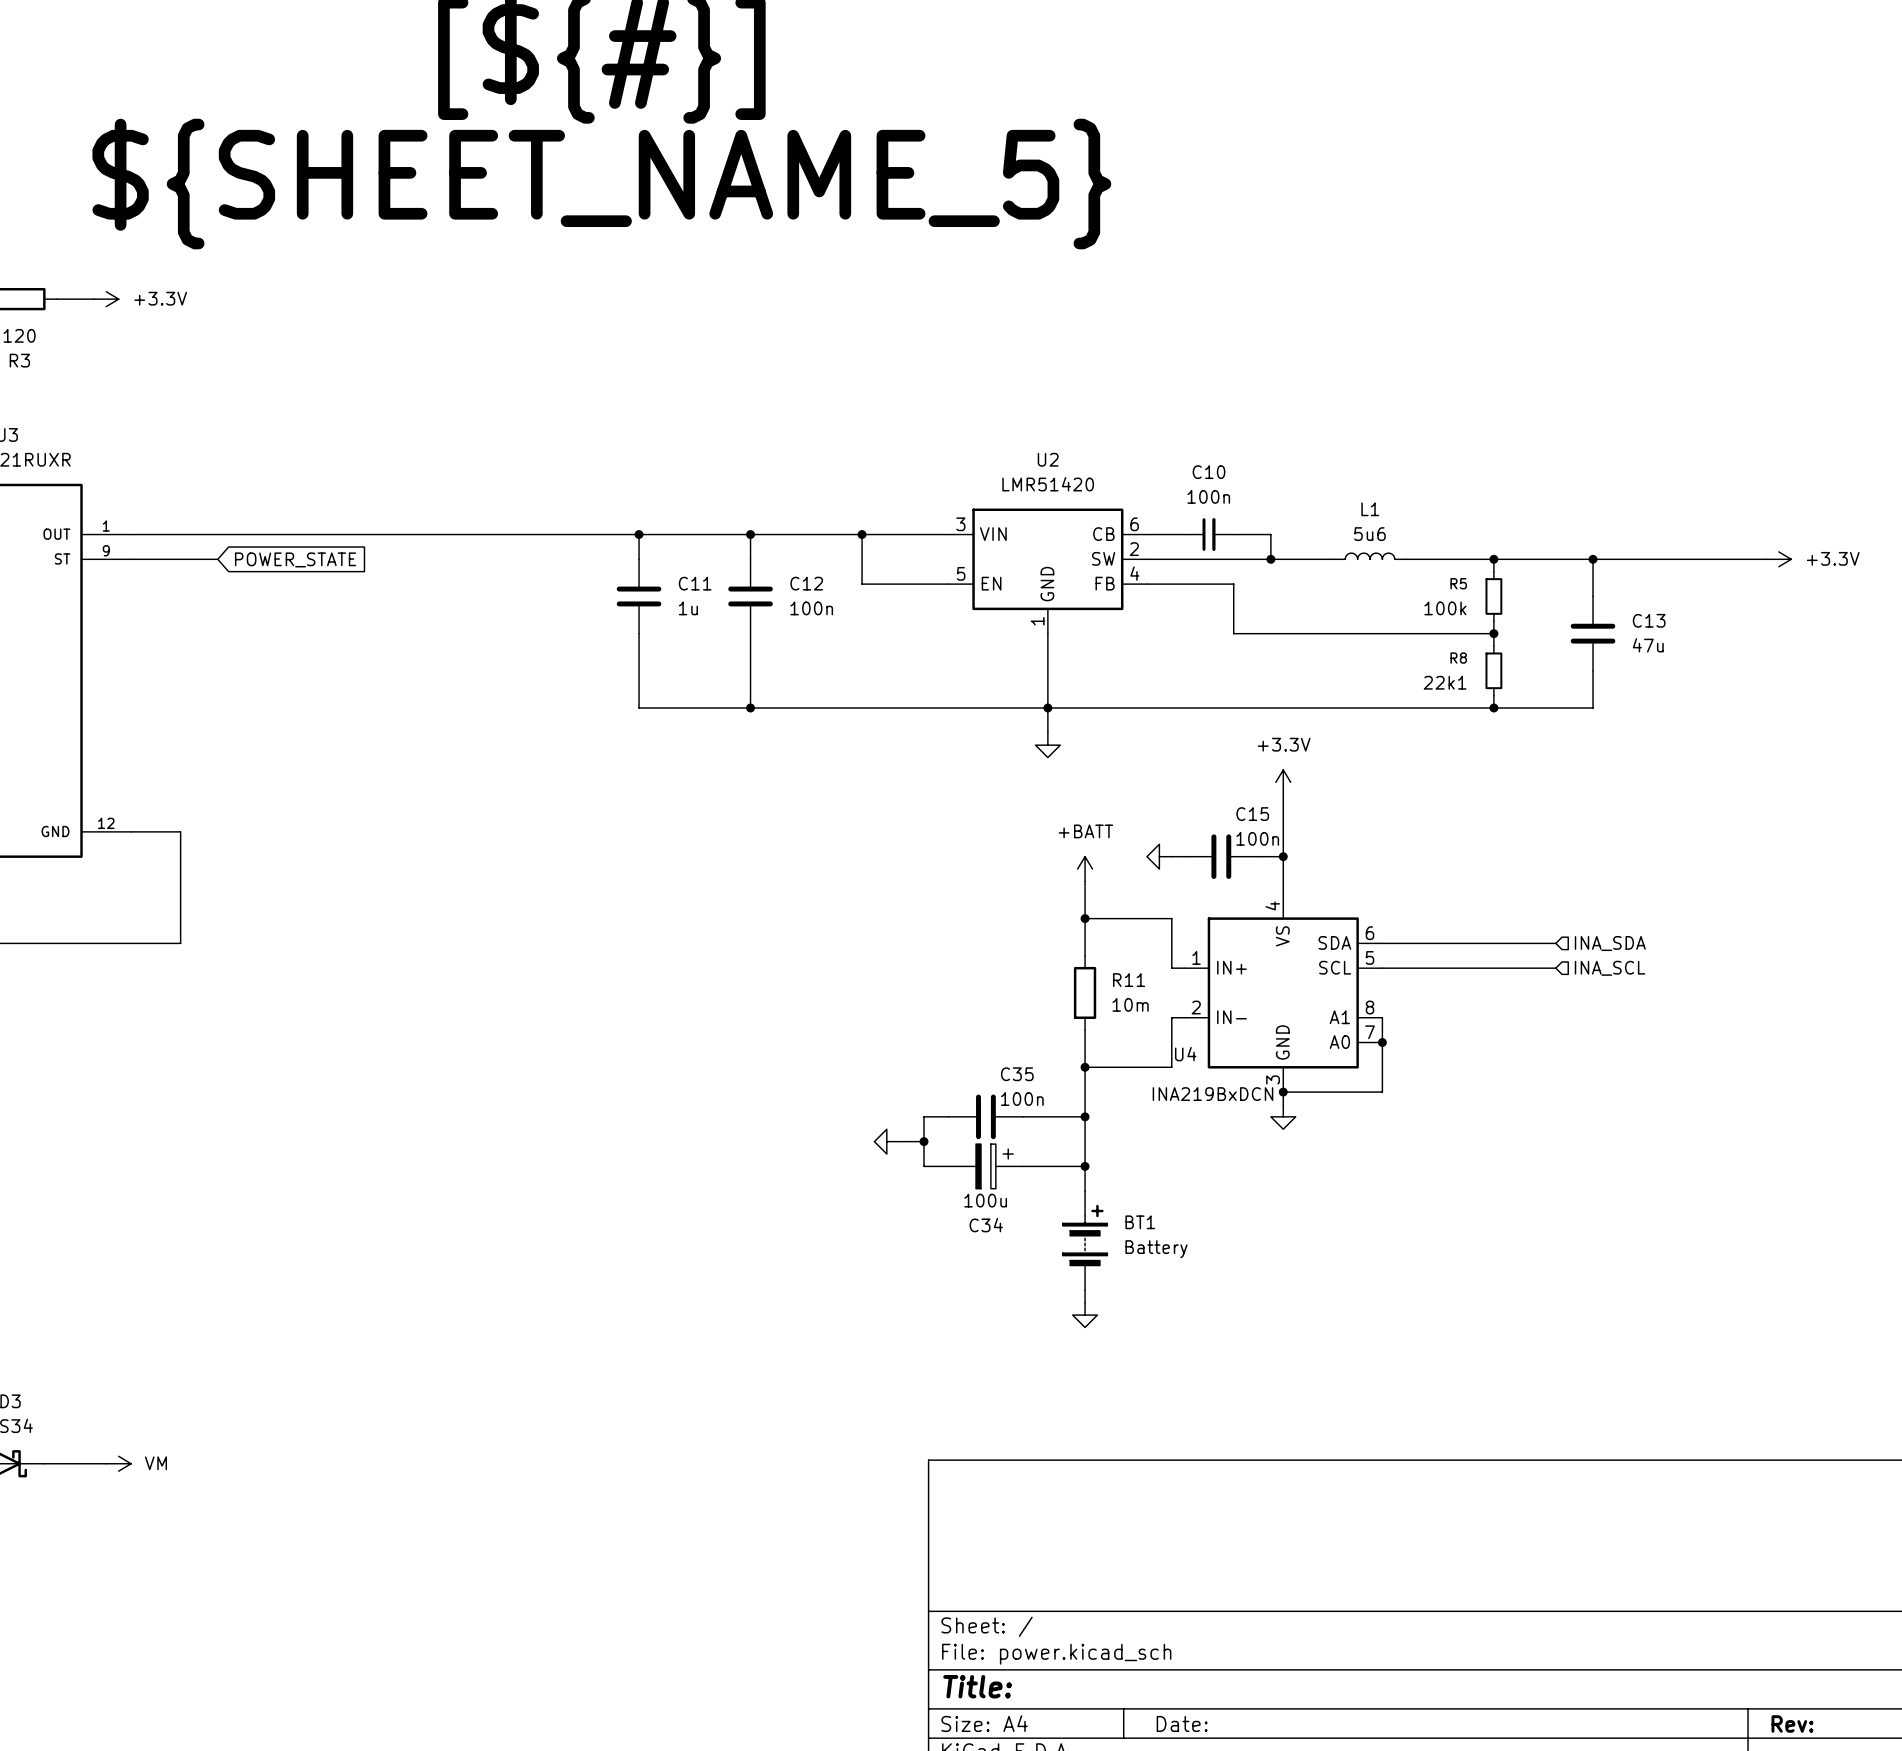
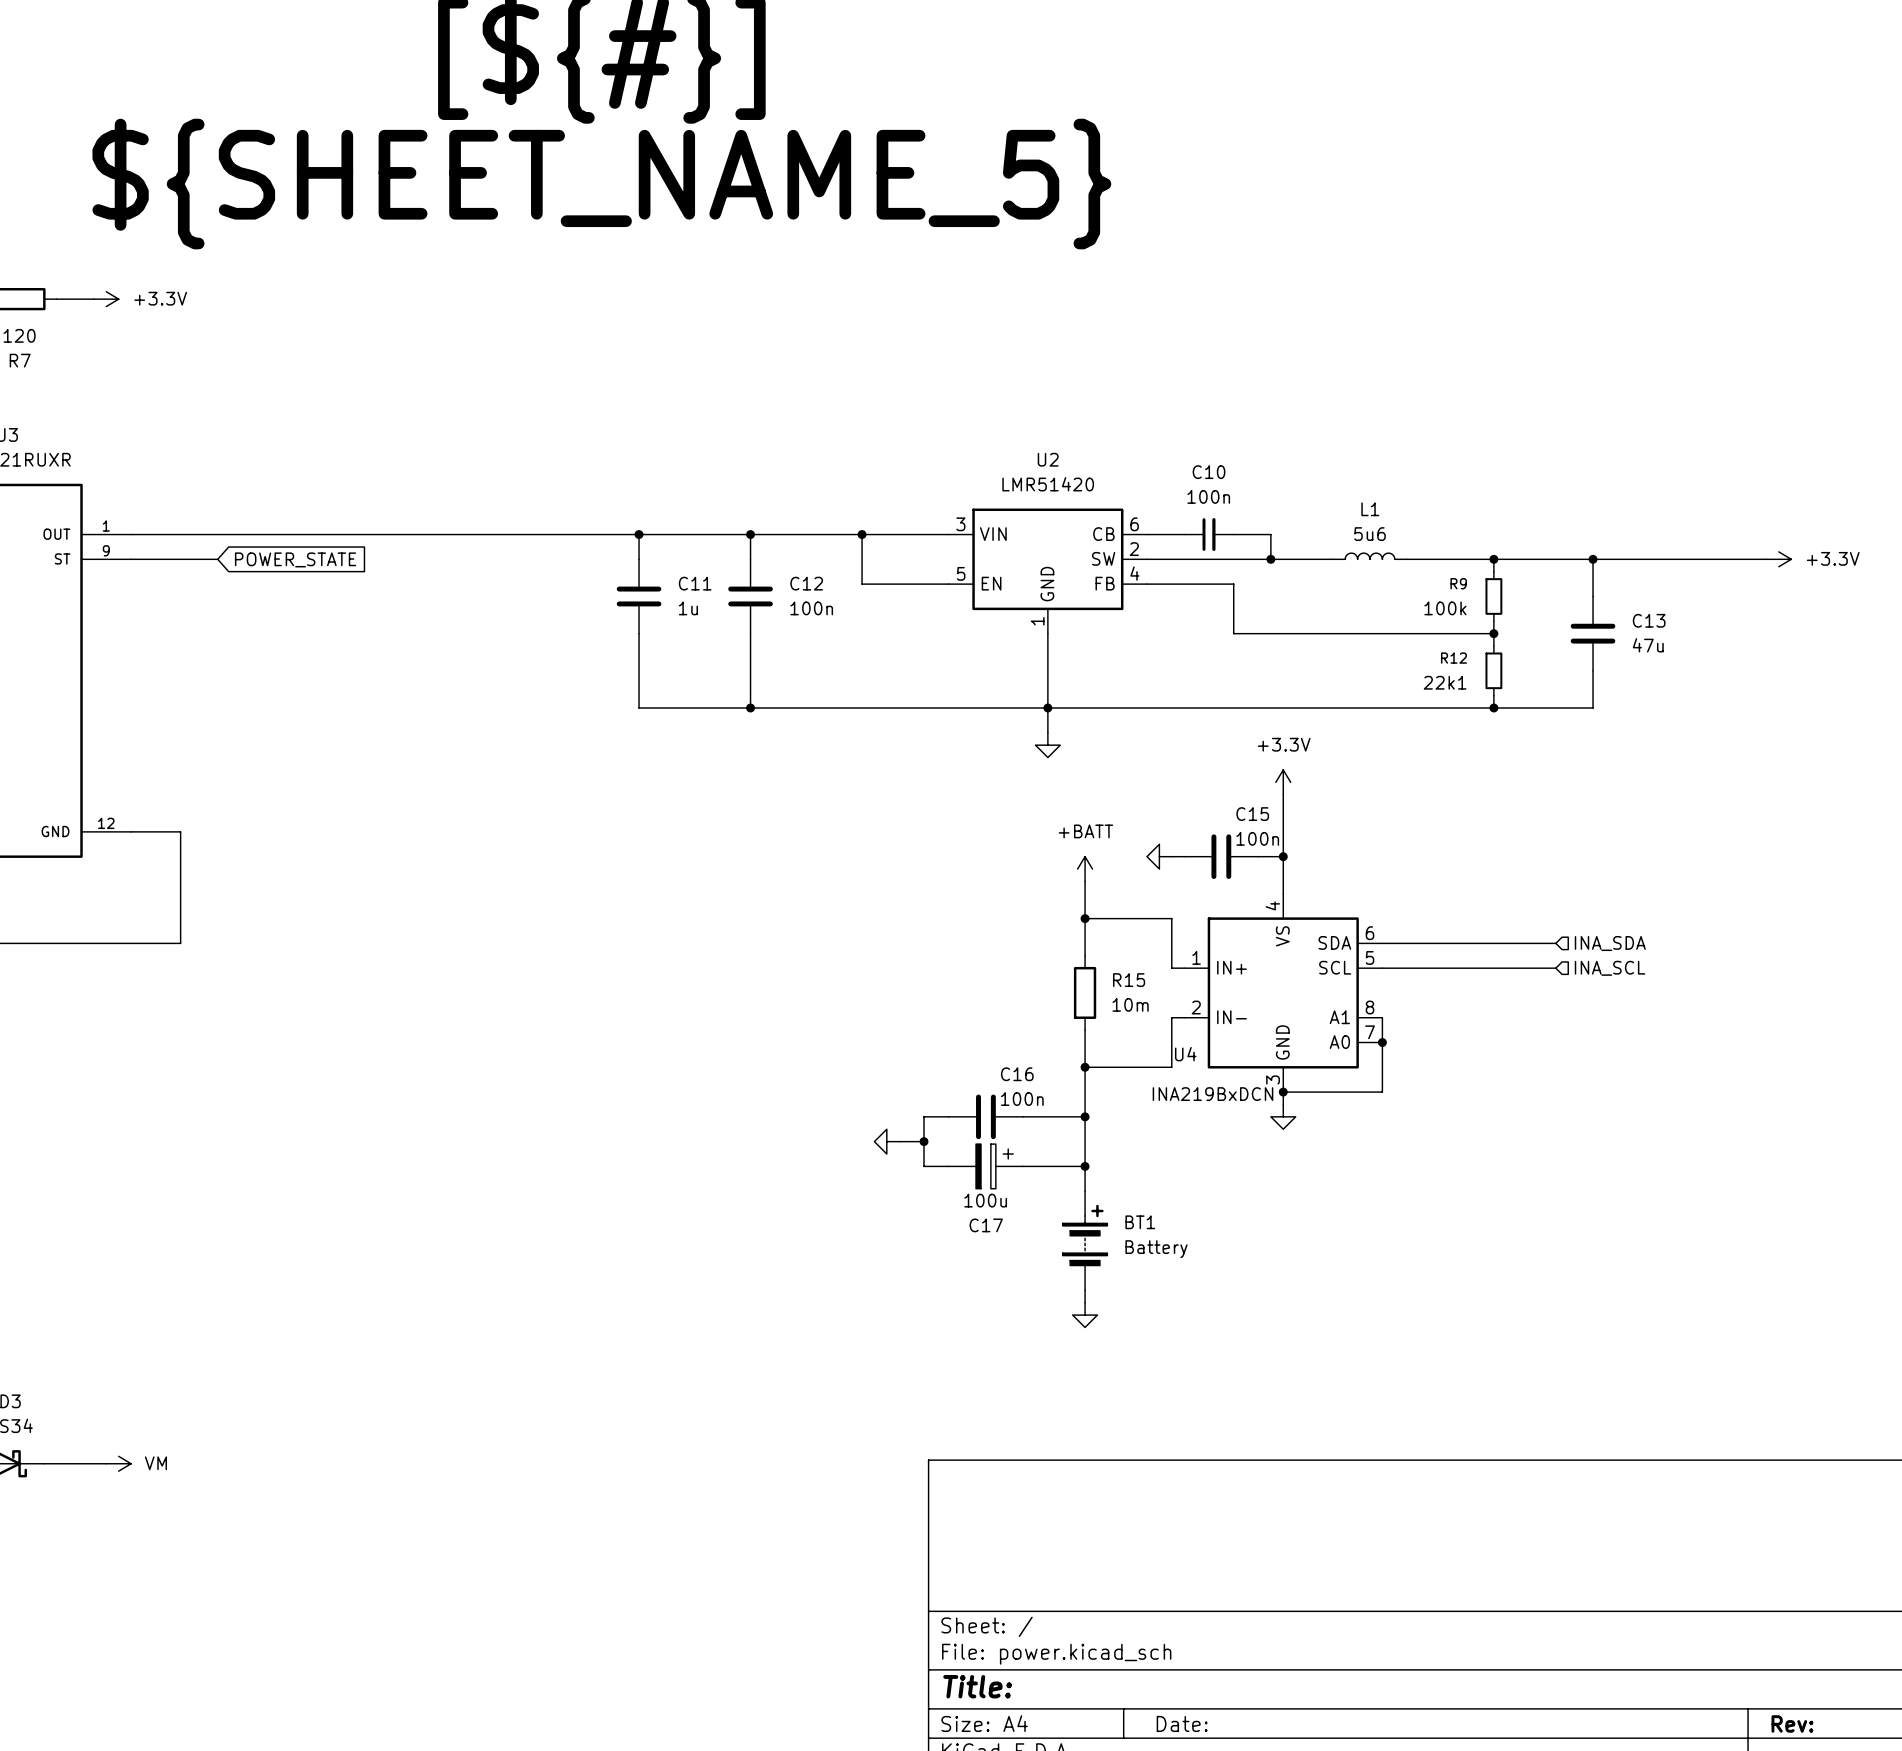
R3 name: R3 (19, 360) -> R7 (20, 360)
R5 name: R5 (1458, 583) -> R9 (1458, 583)
R8 name: R8 (1458, 658) -> R12 (1453, 658)
R11 name: R11 (1129, 980) -> R15 (1129, 980)
C35 name: C35 (1017, 1074) -> C16 (1017, 1074)
C34 name: C34 (986, 1225) -> C17 (986, 1225)

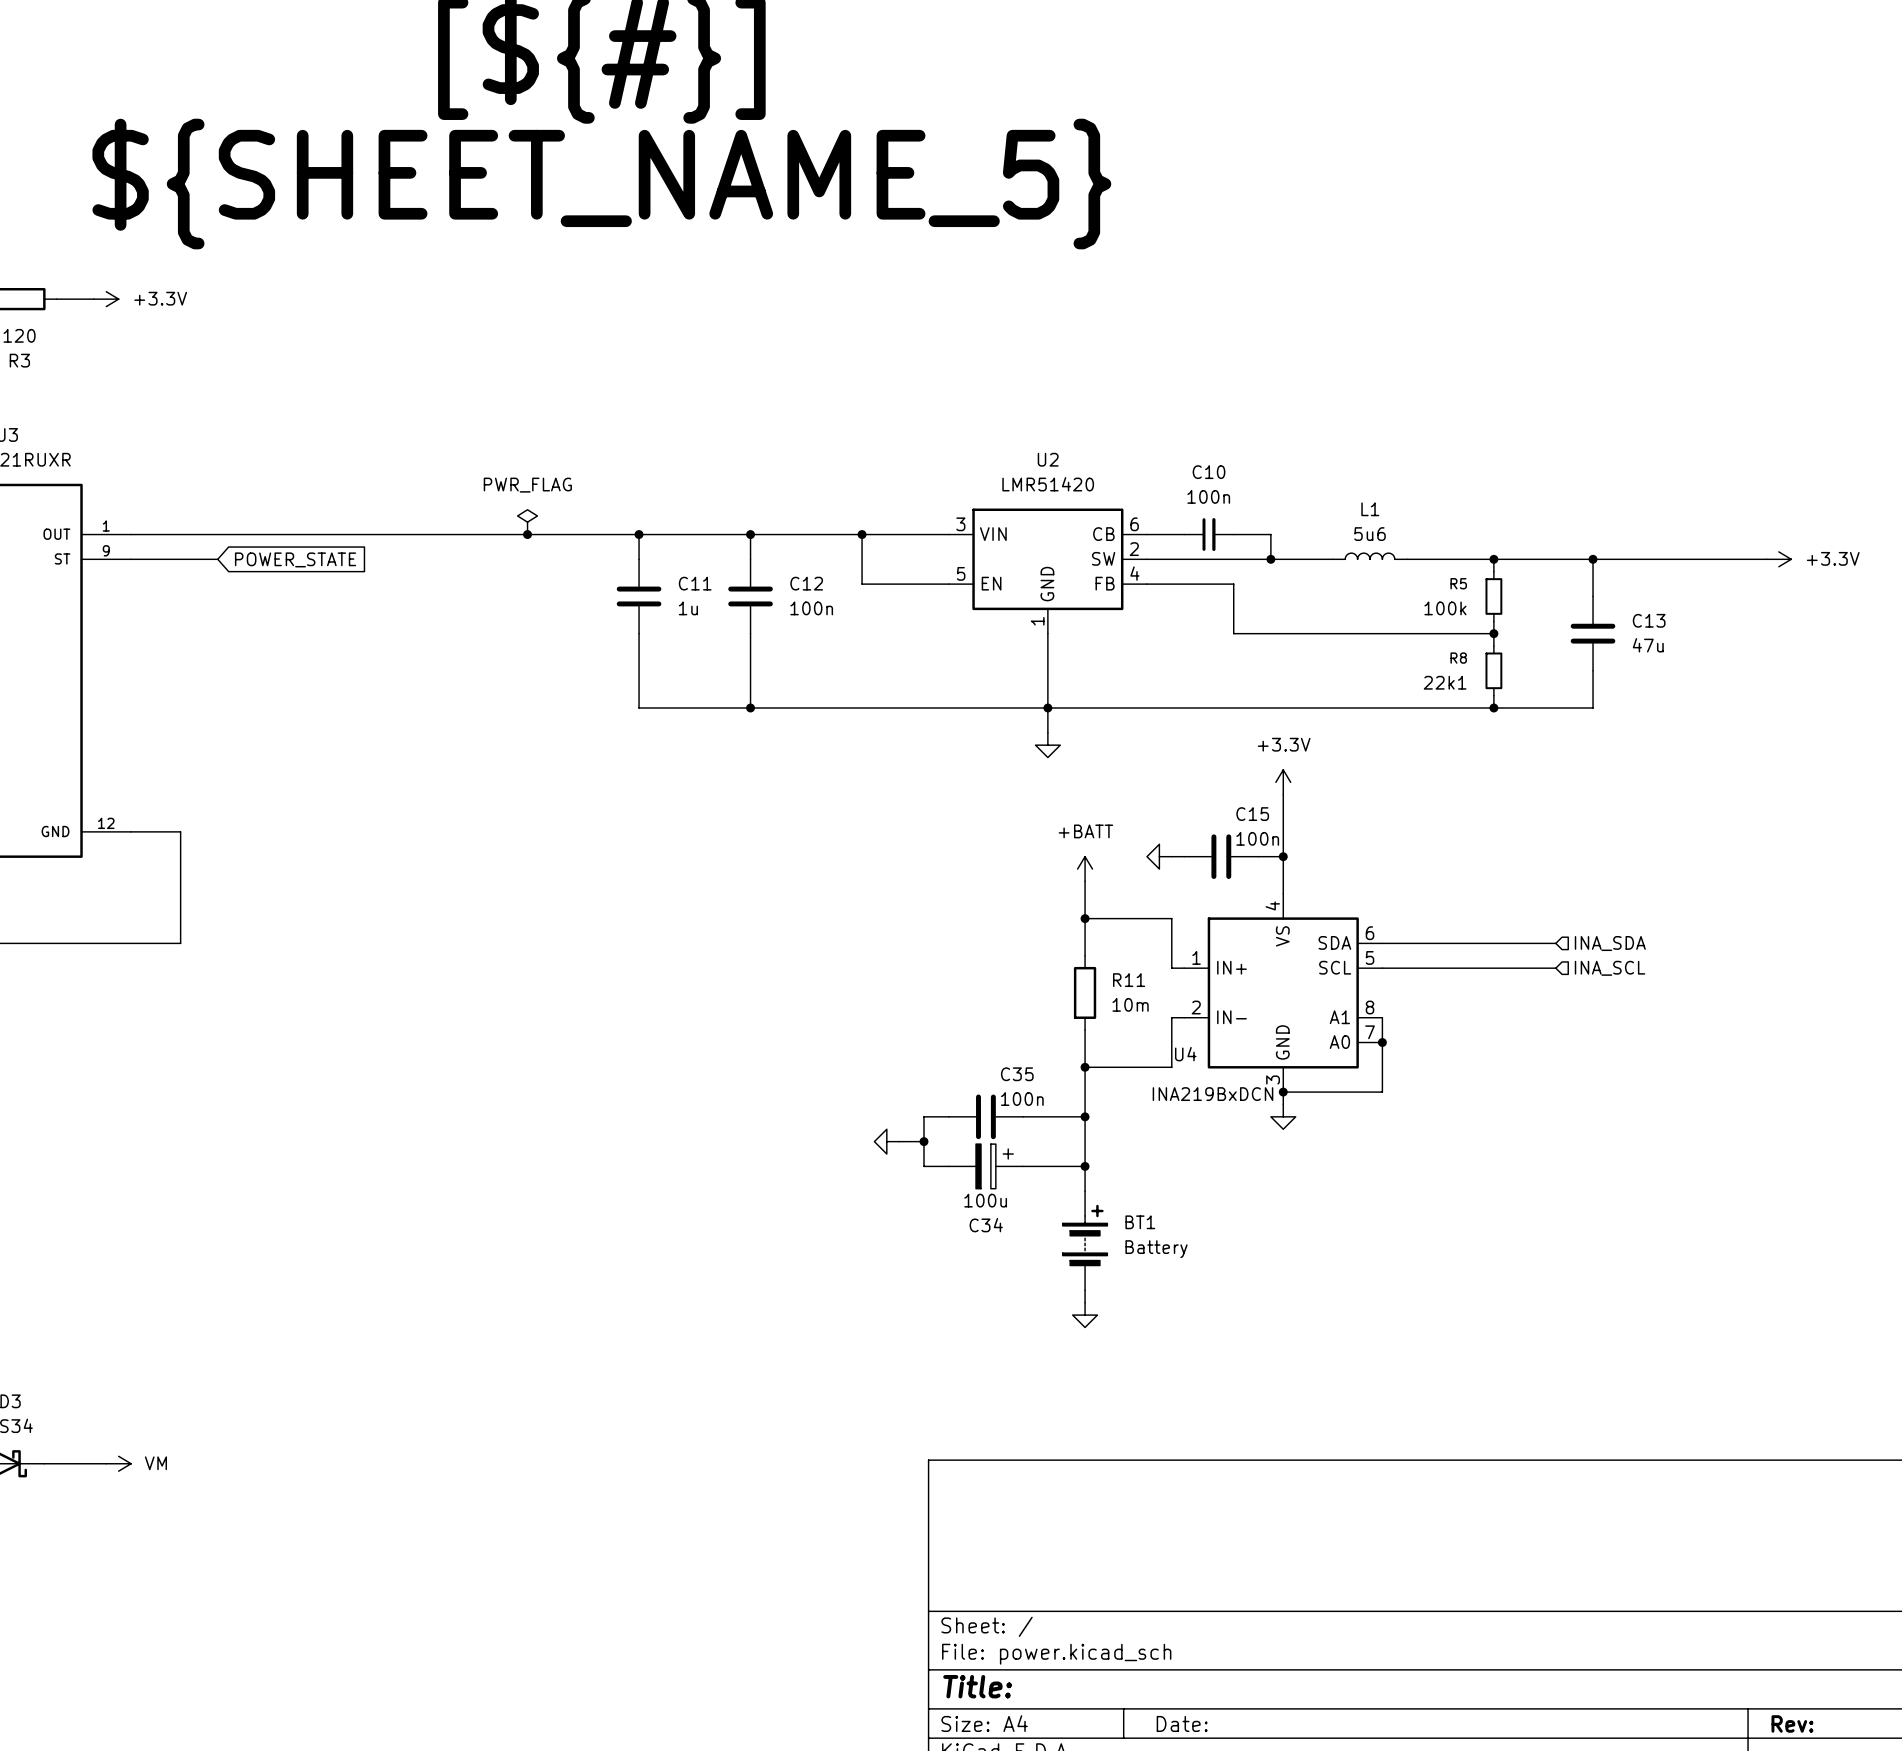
R7 name: R7 (20, 360) -> R3 (19, 360)
power symbol: none -> PWR_FLAG (527, 522)
junction: none -> (527, 534)
R9 name: R9 (1458, 583) -> R5 (1458, 583)
R12 name: R12 (1453, 658) -> R8 (1458, 658)
R15 name: R15 (1129, 980) -> R11 (1129, 980)
C16 name: C16 (1017, 1074) -> C35 (1017, 1074)
C17 name: C17 (986, 1225) -> C34 (986, 1225)

